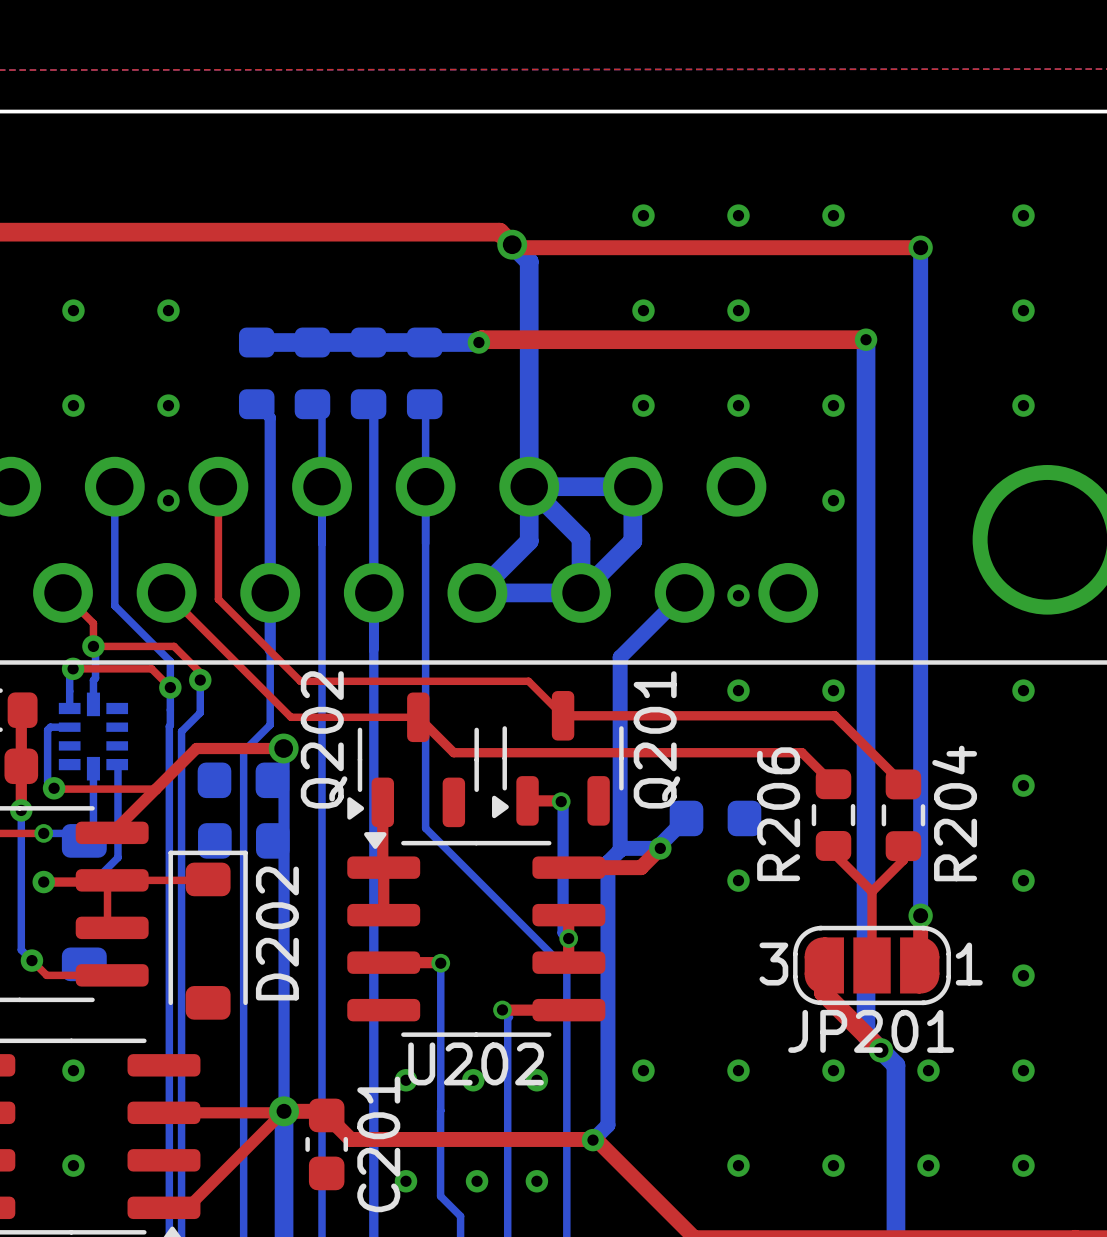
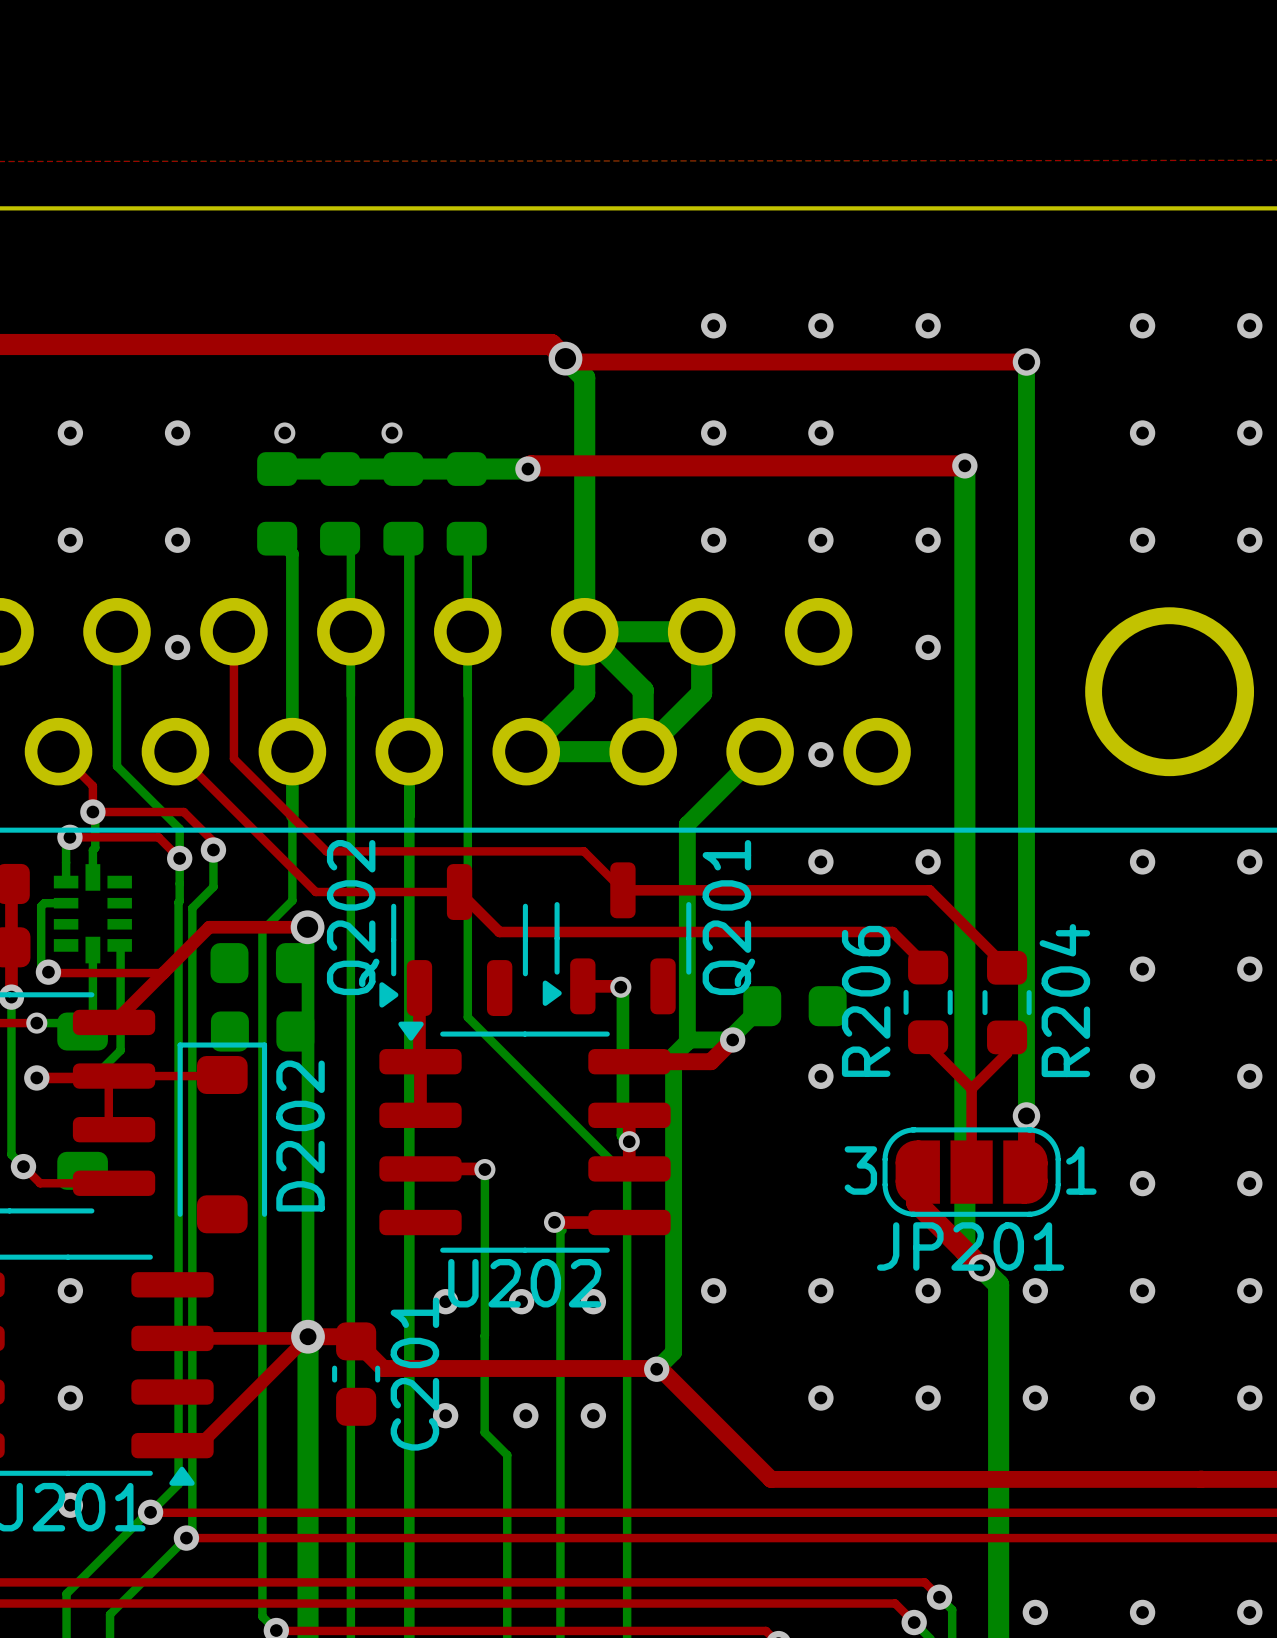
via: none -> (284, 433)
via: none -> (392, 433)

